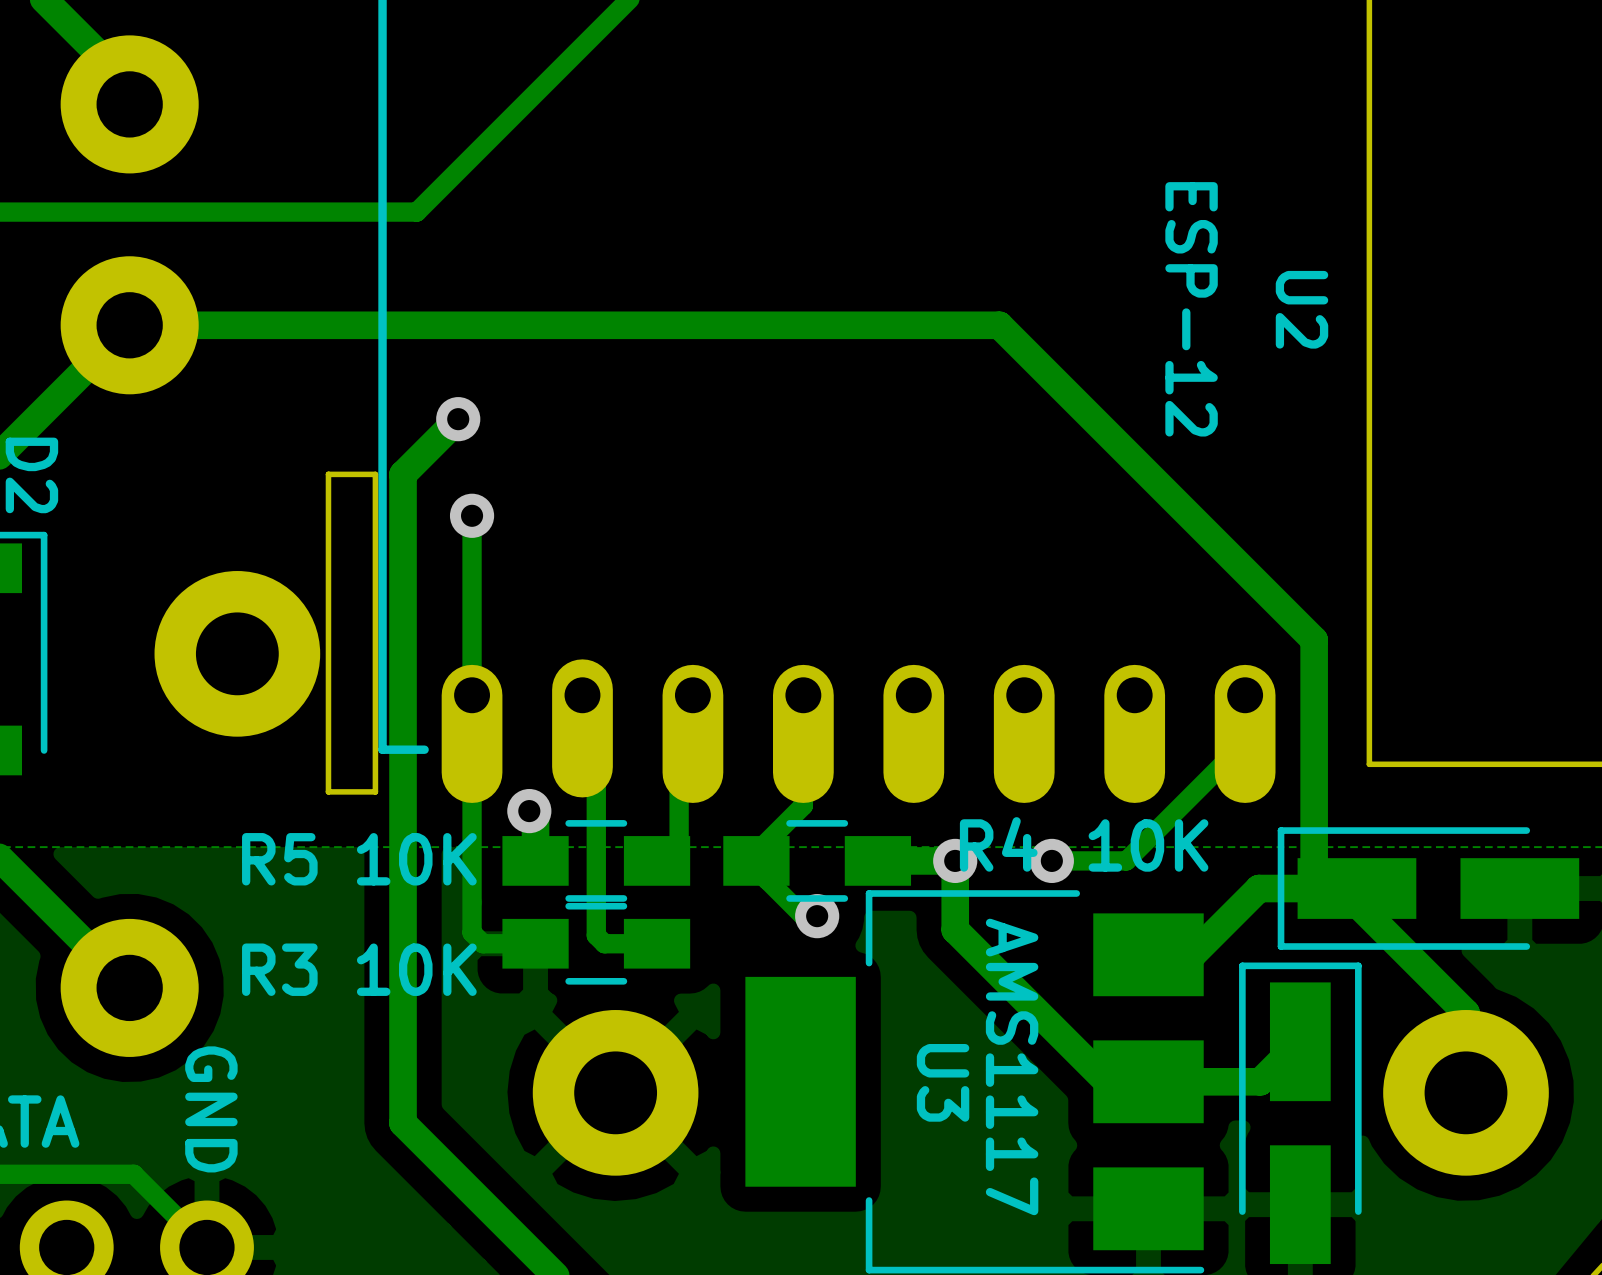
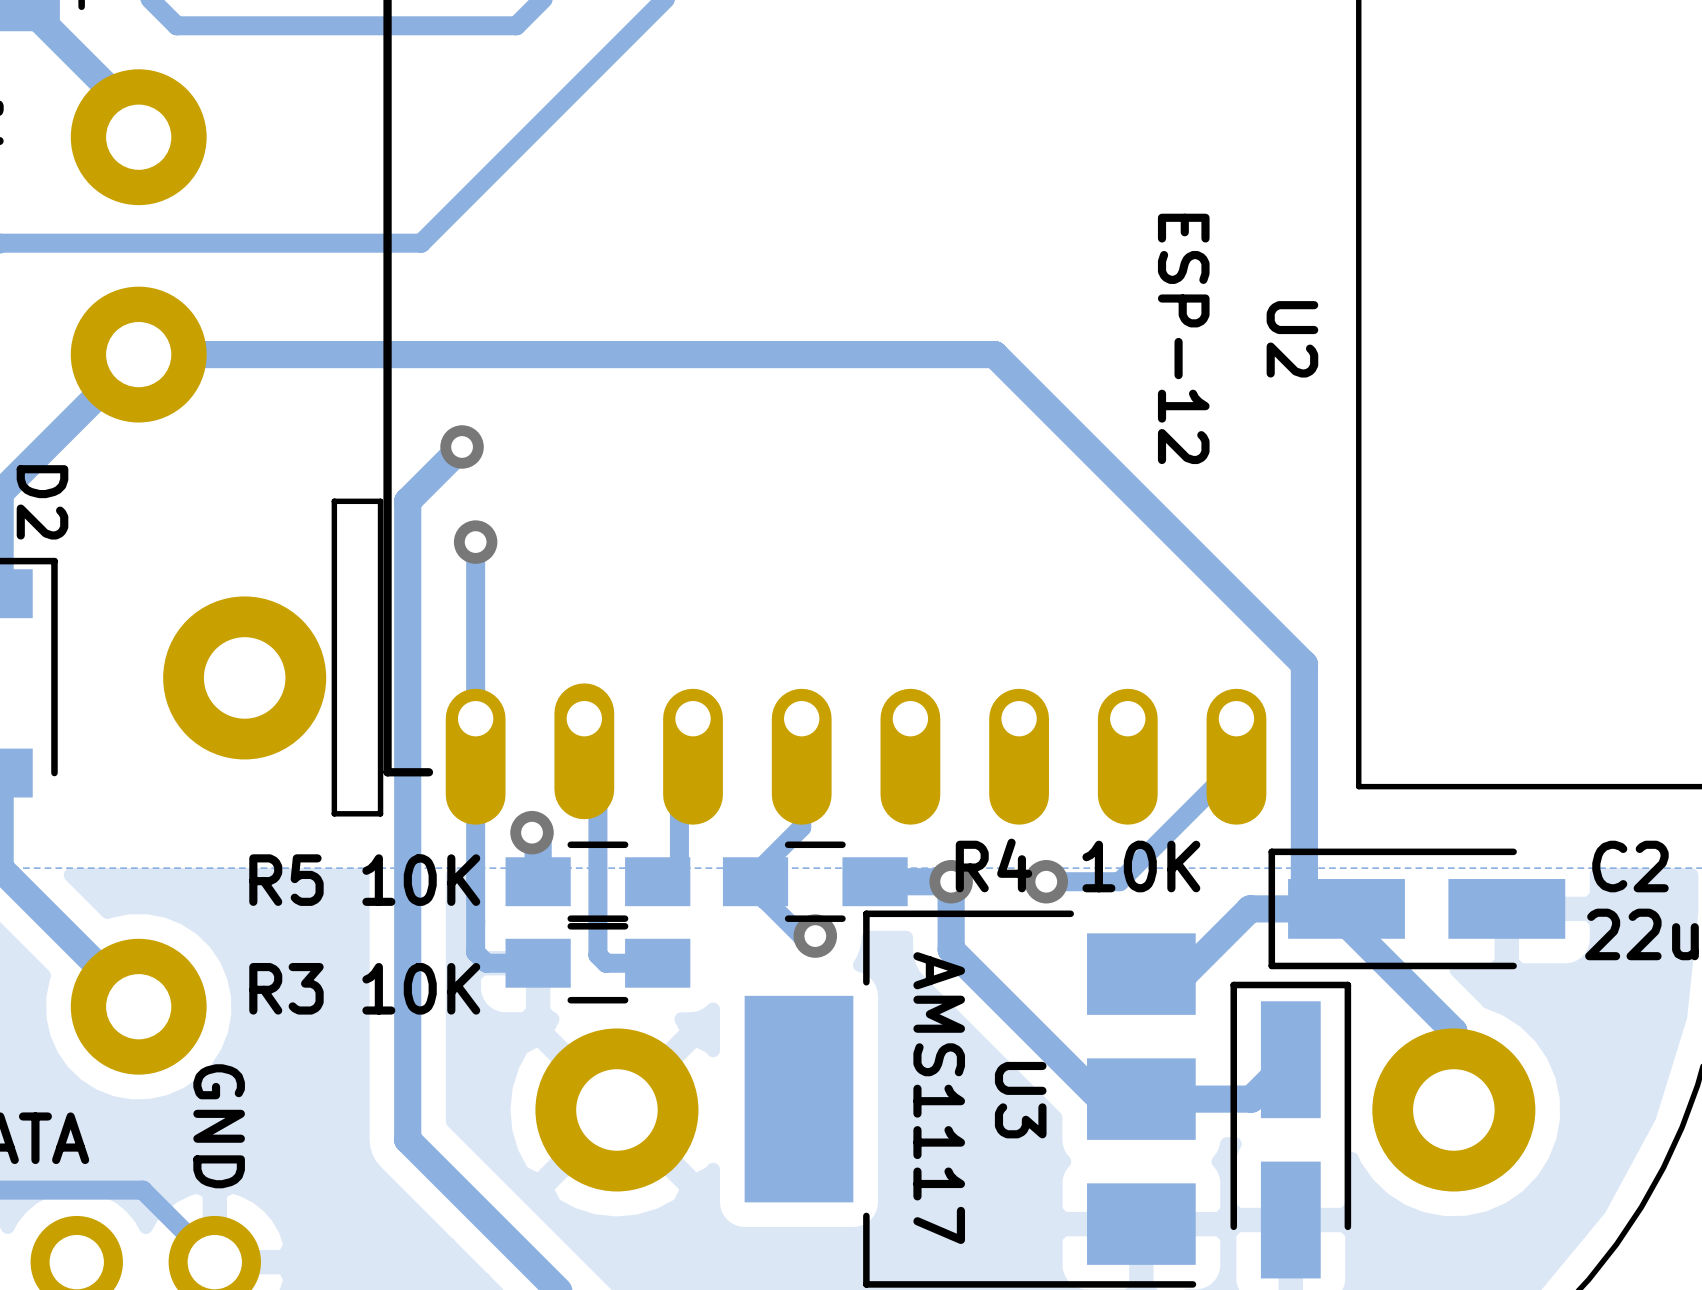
U3 value position: AMS1117 (1012, 1066) -> AMS1117 (939, 1098)
U3 name position: U3 (943, 1082) -> U3 (1020, 1100)

